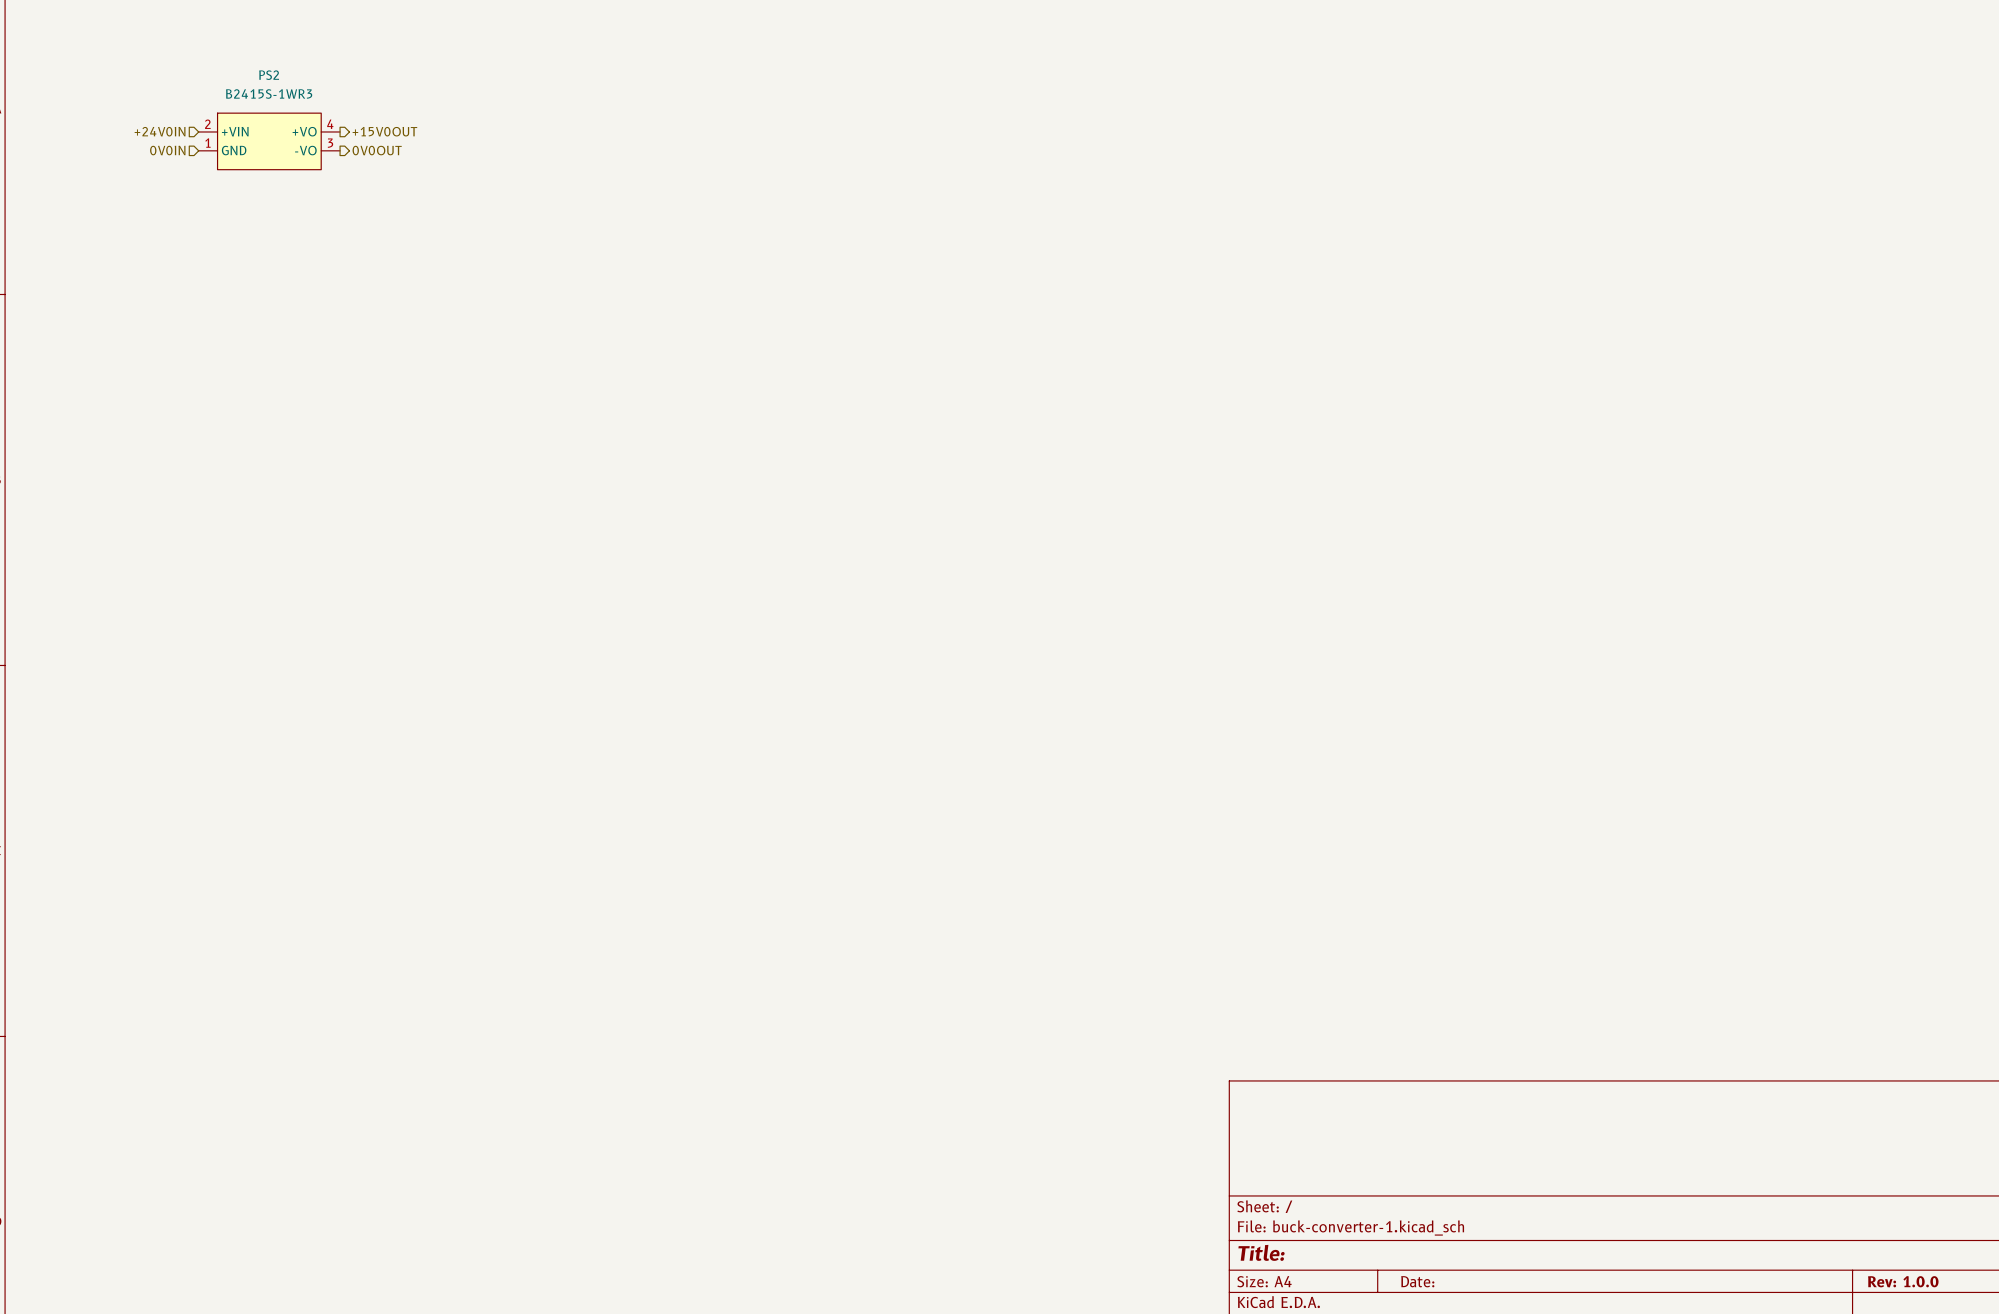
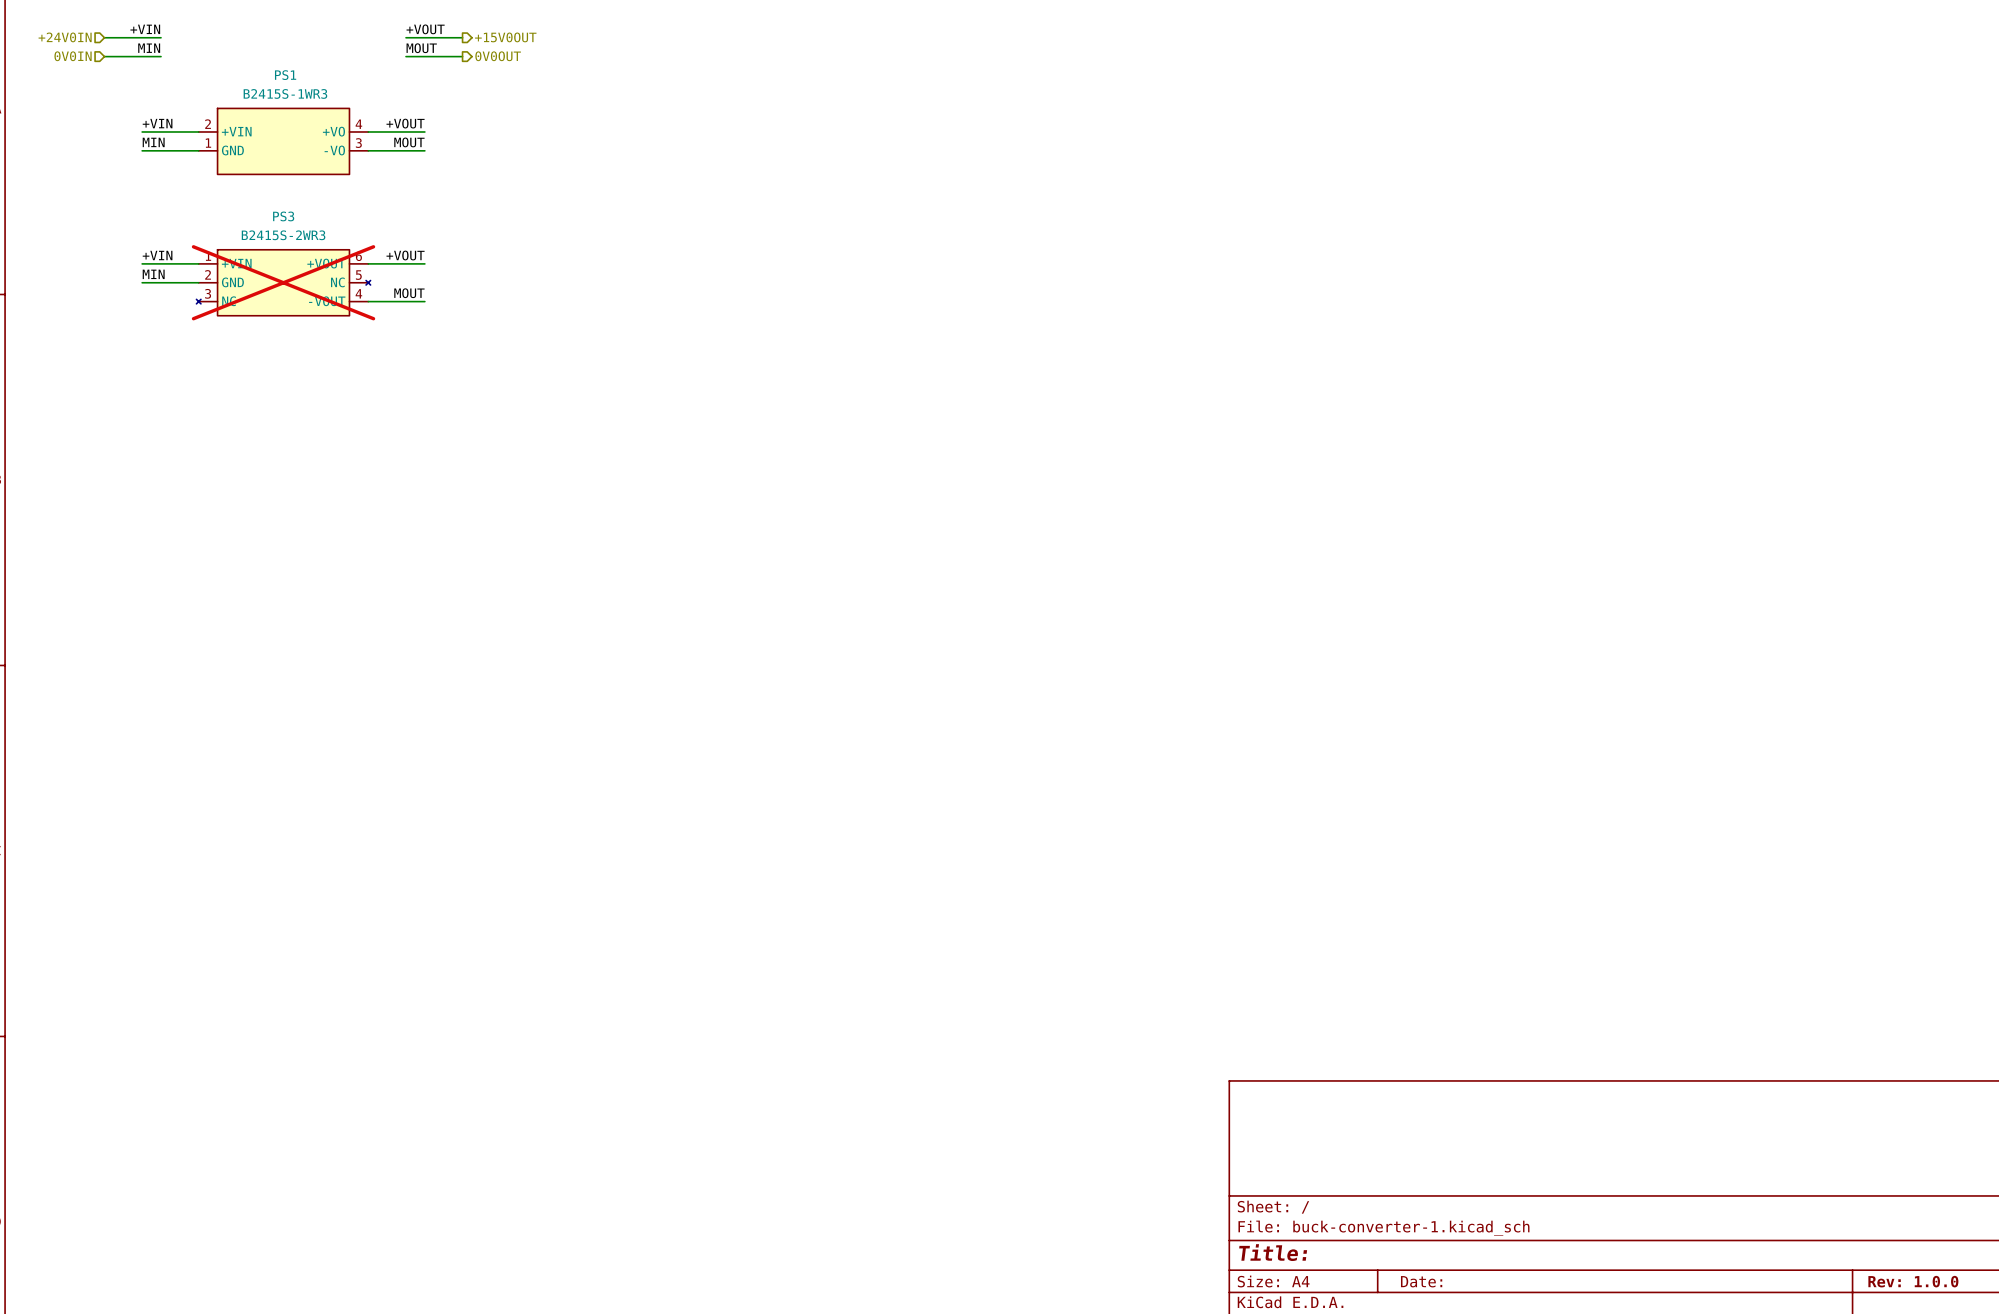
label: none -> +VIN (145, 29)
label: none -> +VOUT (425, 29)
wire: none -> (104, 37) (161, 37)
wire: none -> (406, 37) (462, 37)
label: none -> MIN (149, 48)
label: none -> MOUT (421, 48)
wire: none -> (104, 56) (161, 56)
wire: none -> (406, 56) (462, 56)
label: none -> +VIN (157, 123)
label: none -> +VOUT (405, 123)
wire: none -> (142, 131) (198, 131)
hierarchical label position: +24V0IN (160, 131) -> +24V0IN (65, 37)
wire: none -> (368, 131) (424, 131)
hierarchical label position: +15V0OUT (384, 131) -> +15V0OUT (505, 37)
PS2: B2415S-1WR3 (269, 141) -> none
PS1: none -> B2415S-1WR3 (283, 141)
label: none -> MIN (153, 142)
label: none -> MOUT (409, 142)
wire: none -> (142, 150) (198, 150)
hierarchical label position: 0V0IN (167, 150) -> 0V0IN (73, 56)
wire: none -> (368, 150) (424, 150)
hierarchical label position: 0V0OUT (377, 150) -> 0V0OUT (498, 56)
label: none -> +VIN (157, 255)
label: none -> +VOUT (405, 255)
wire: none -> (142, 263) (198, 263)
wire: none -> (368, 263) (424, 263)
label: none -> MIN (153, 274)
wire: none -> (142, 282) (198, 282)
PS3: none -> B2415S-2WR3 (283, 282)
label: none -> MOUT (409, 293)
wire: none -> (368, 301) (424, 301)

